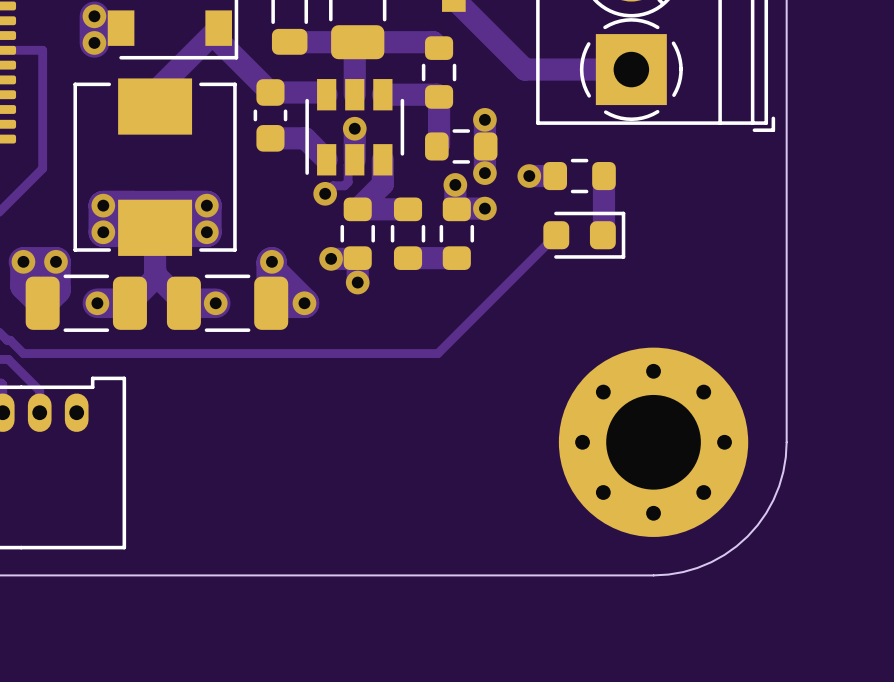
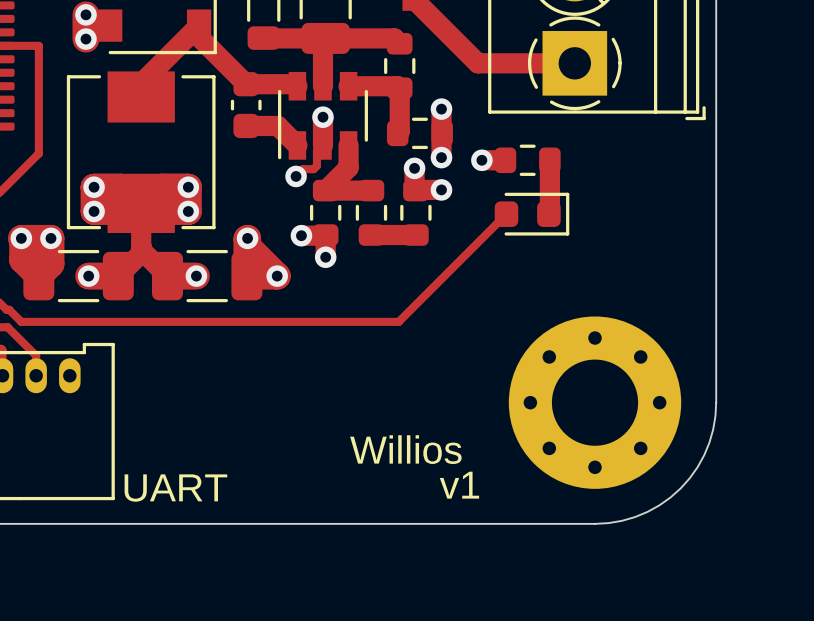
text: none -> Willios (405, 449)
text: none -> v1 (459, 485)
text: none -> UART (175, 488)

